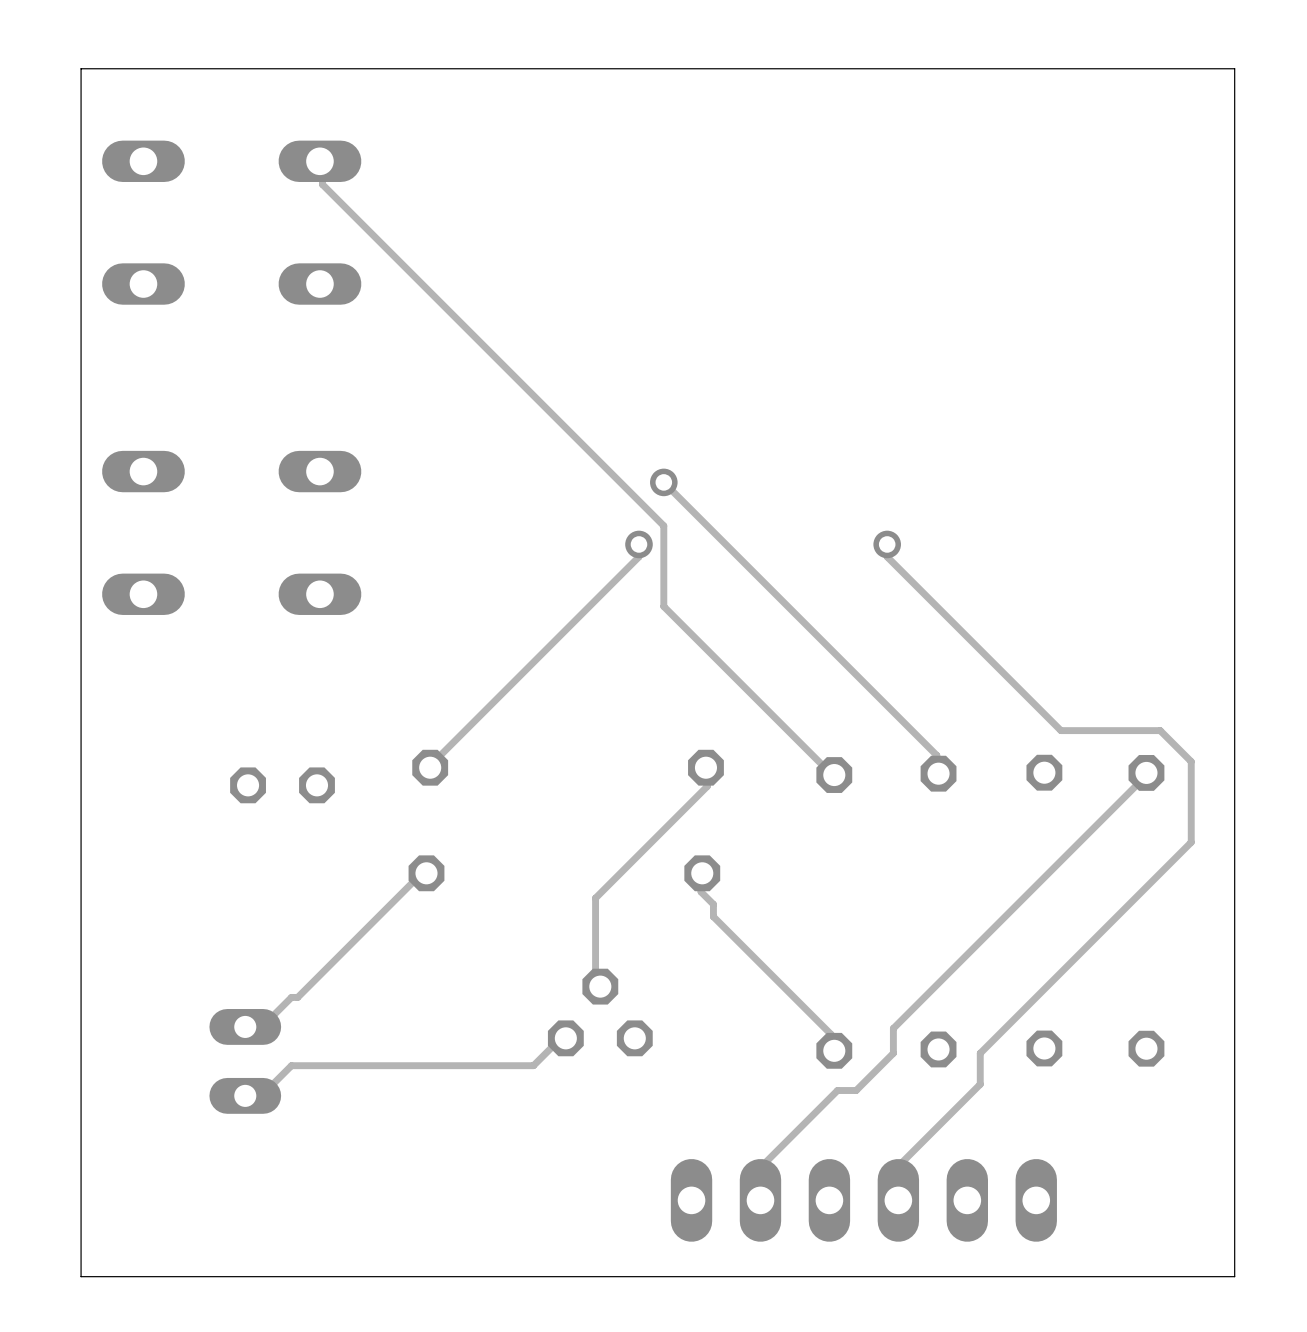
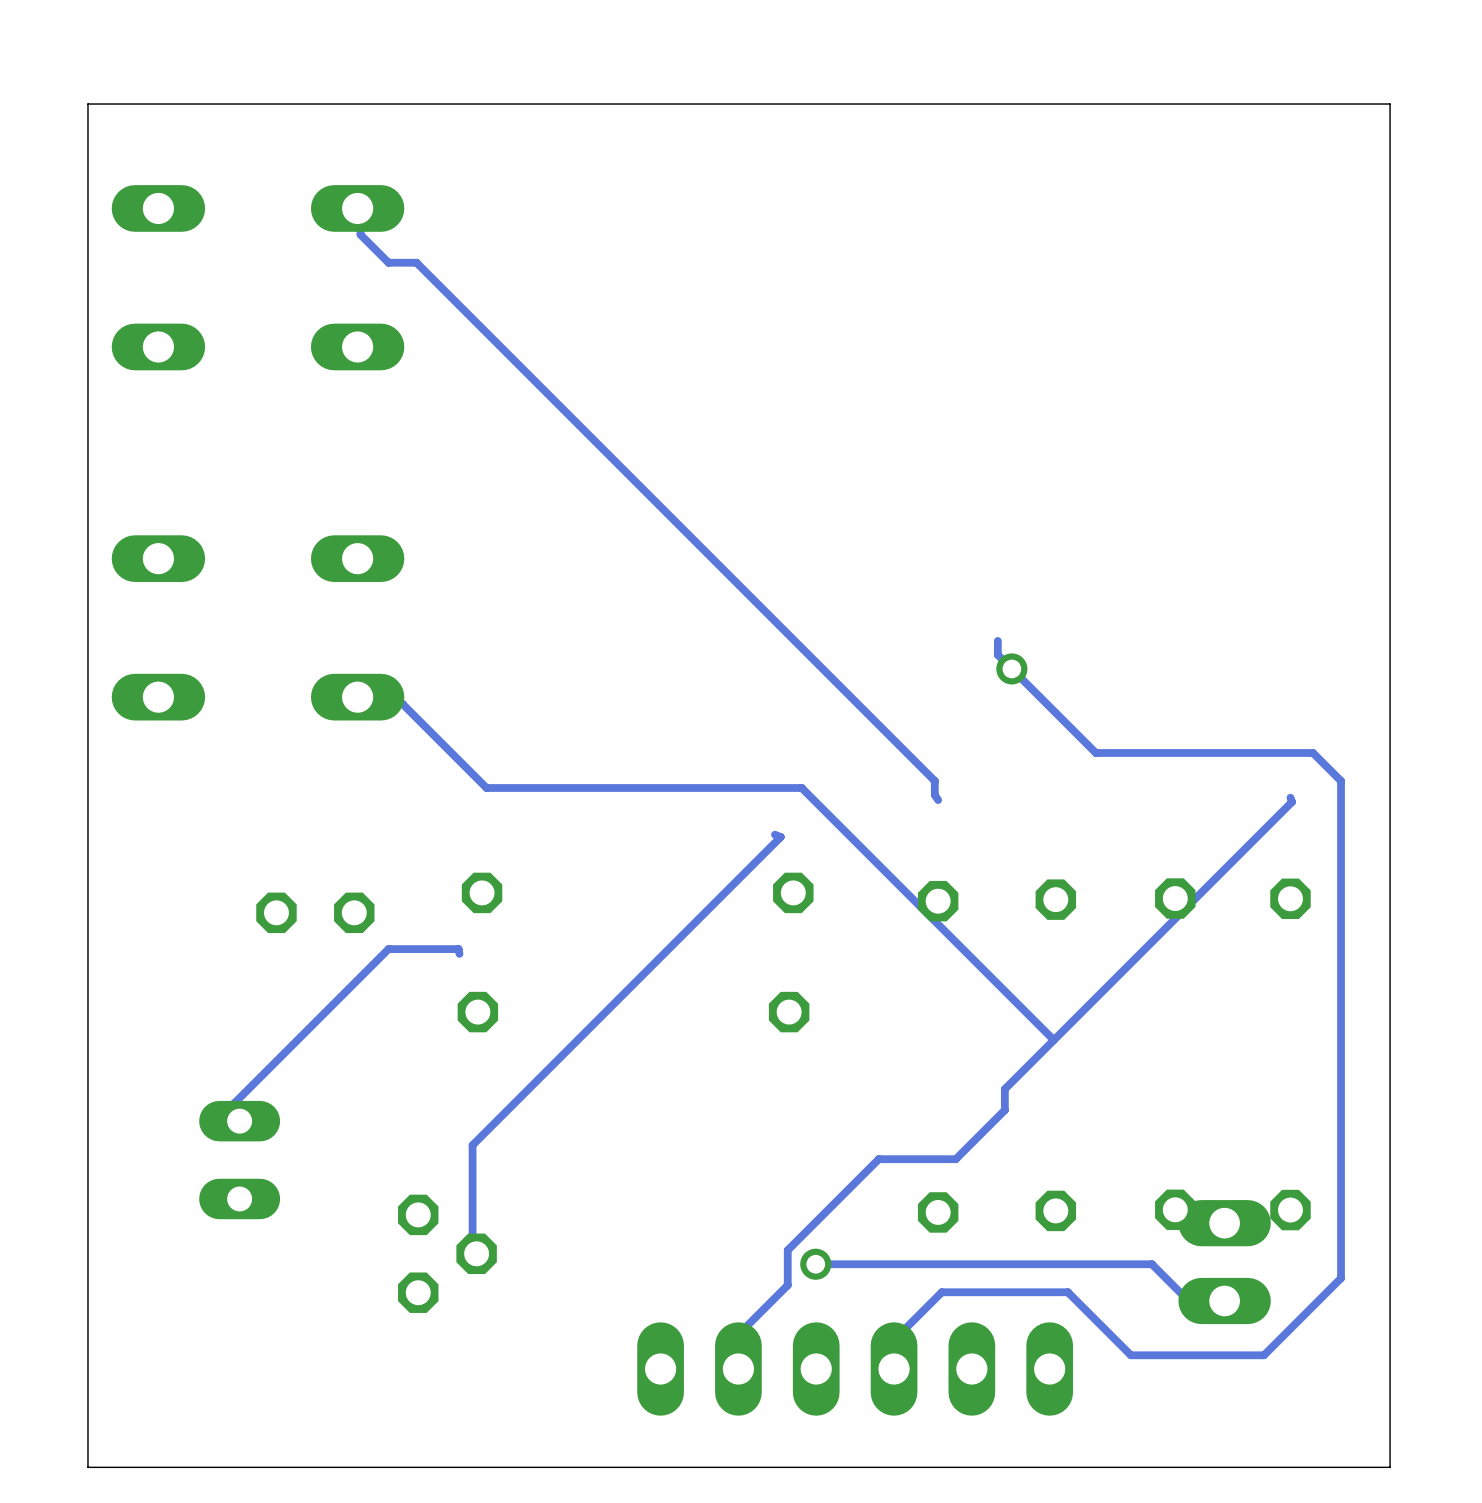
track: (347, 209) (663, 525) (663, 606) (834, 775) -> (388, 262) (416, 262) (934, 781) (934, 795) (938, 800)
track: (663, 482) (936, 755) (938, 773) -> none
via: (663, 482) -> none
track: (638, 544) (638, 556) (440, 755) (434, 755) (428, 761) (430, 767) -> none
via: (638, 544) -> none
via position: (887, 544) -> (1011, 668)
track: none -> (357, 697) (360, 703) (402, 703) (486, 788) (801, 788) (1053, 1040)
track: (974, 643) (1060, 730) (1160, 730) (1191, 761) -> (1095, 752) (1313, 752) (1341, 781) (1341, 886)
track: none -> (1290, 797) (1292, 802) (1004, 1089) (1004, 1110) (955, 1159) (878, 1159) (787, 1250) (787, 1285) (738, 1334) (738, 1369)
track: none -> (774, 834) (780, 837) (472, 1145) (472, 1250) (476, 1253)
track: (705, 767) (707, 786) (595, 898) (595, 985) (600, 986) -> none
track: (1146, 772) (1147, 774) (893, 1028) (893, 1053) (856, 1090) (837, 1090) (763, 1164) (763, 1196) (760, 1200) -> none
track: none -> (459, 953) (458, 949) (388, 949) (234, 1103) (234, 1117) (239, 1121)
track: (1191, 842) (980, 1053) (980, 1084) (899, 1164) (898, 1200) -> (1341, 977) (1341, 1278) (1263, 1355) (1130, 1355) (1067, 1292) (941, 1292) (899, 1334) (899, 1362) (894, 1369)
track: (426, 873) (421, 873) (297, 997) (291, 997) (266, 1022) (248, 1022) (245, 1026) -> none
track: (702, 873) (701, 891) (713, 904) (713, 916) (831, 1034) (831, 1047) (834, 1050) -> none
part rotation: 0° (600, 1012) -> 90° clockwise (447, 1253)
part position: (600, 1012) -> (447, 1253)
track: (565, 1038) (564, 1040) (558, 1040) (533, 1065) (291, 1065) (266, 1090) (248, 1090) (245, 1095) -> none
part position: (245, 1061) -> (239, 1160)
part: none -> (1224, 1262)
track: none -> (815, 1264) (1151, 1264) (1186, 1299) (1221, 1299) (1224, 1300)
via: none -> (815, 1264)
part position: (863, 1200) -> (855, 1369)

